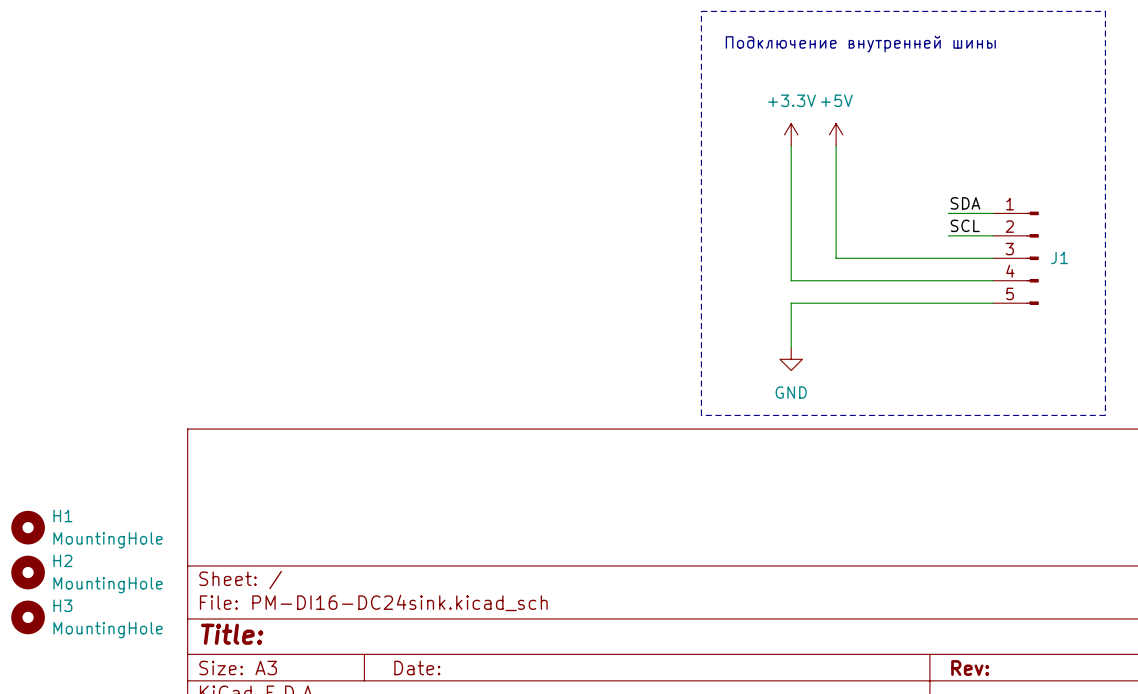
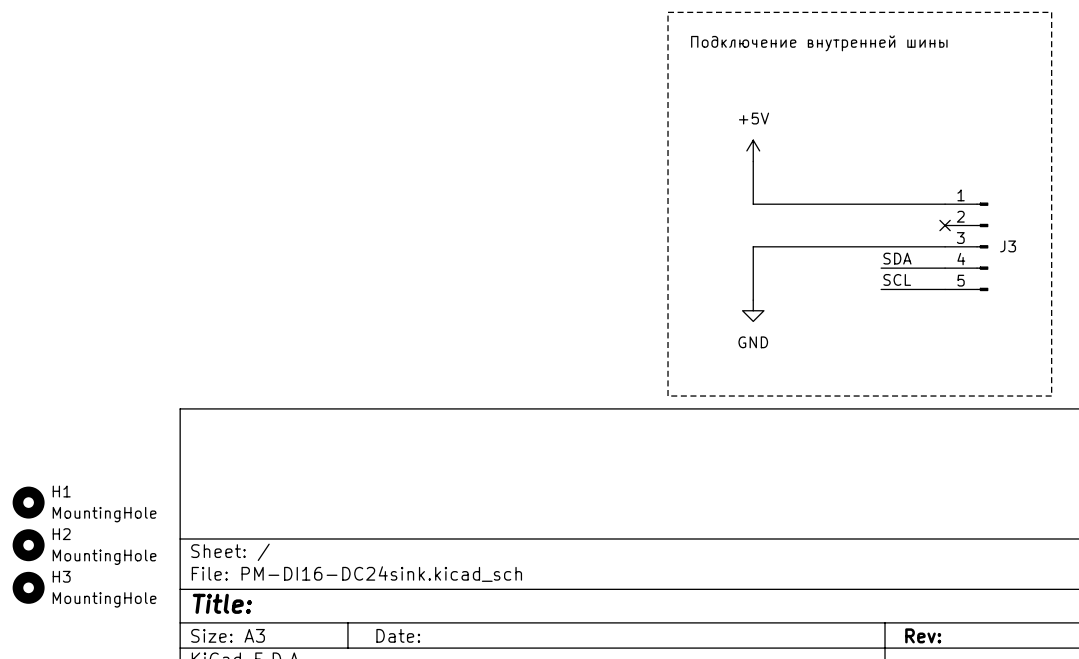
power symbol: +3.3V (791, 134) -> none
power symbol position: +5V (836, 134) -> +5V (753, 150)
wire: (836, 146) (836, 258) -> none
label position: SDA (965, 203) -> SDA (897, 258)
wire: (791, 213) (791, 258) -> (795, 246) (753, 246)
wire: none -> (753, 204) (902, 204)
label position: SCL (965, 225) -> SCL (897, 279)
wire: (948, 235) (993, 235) -> none
no-connect mark: none -> (945, 225)
J1 name: J1 (1059, 257) -> J3 (1008, 246)
wire: (791, 280) (925, 280) -> (753, 268) (753, 289)
wire: (791, 303) (925, 303) -> none
wire: (791, 314) (791, 348) -> none
power symbol position: GND (791, 359) -> GND (753, 310)

